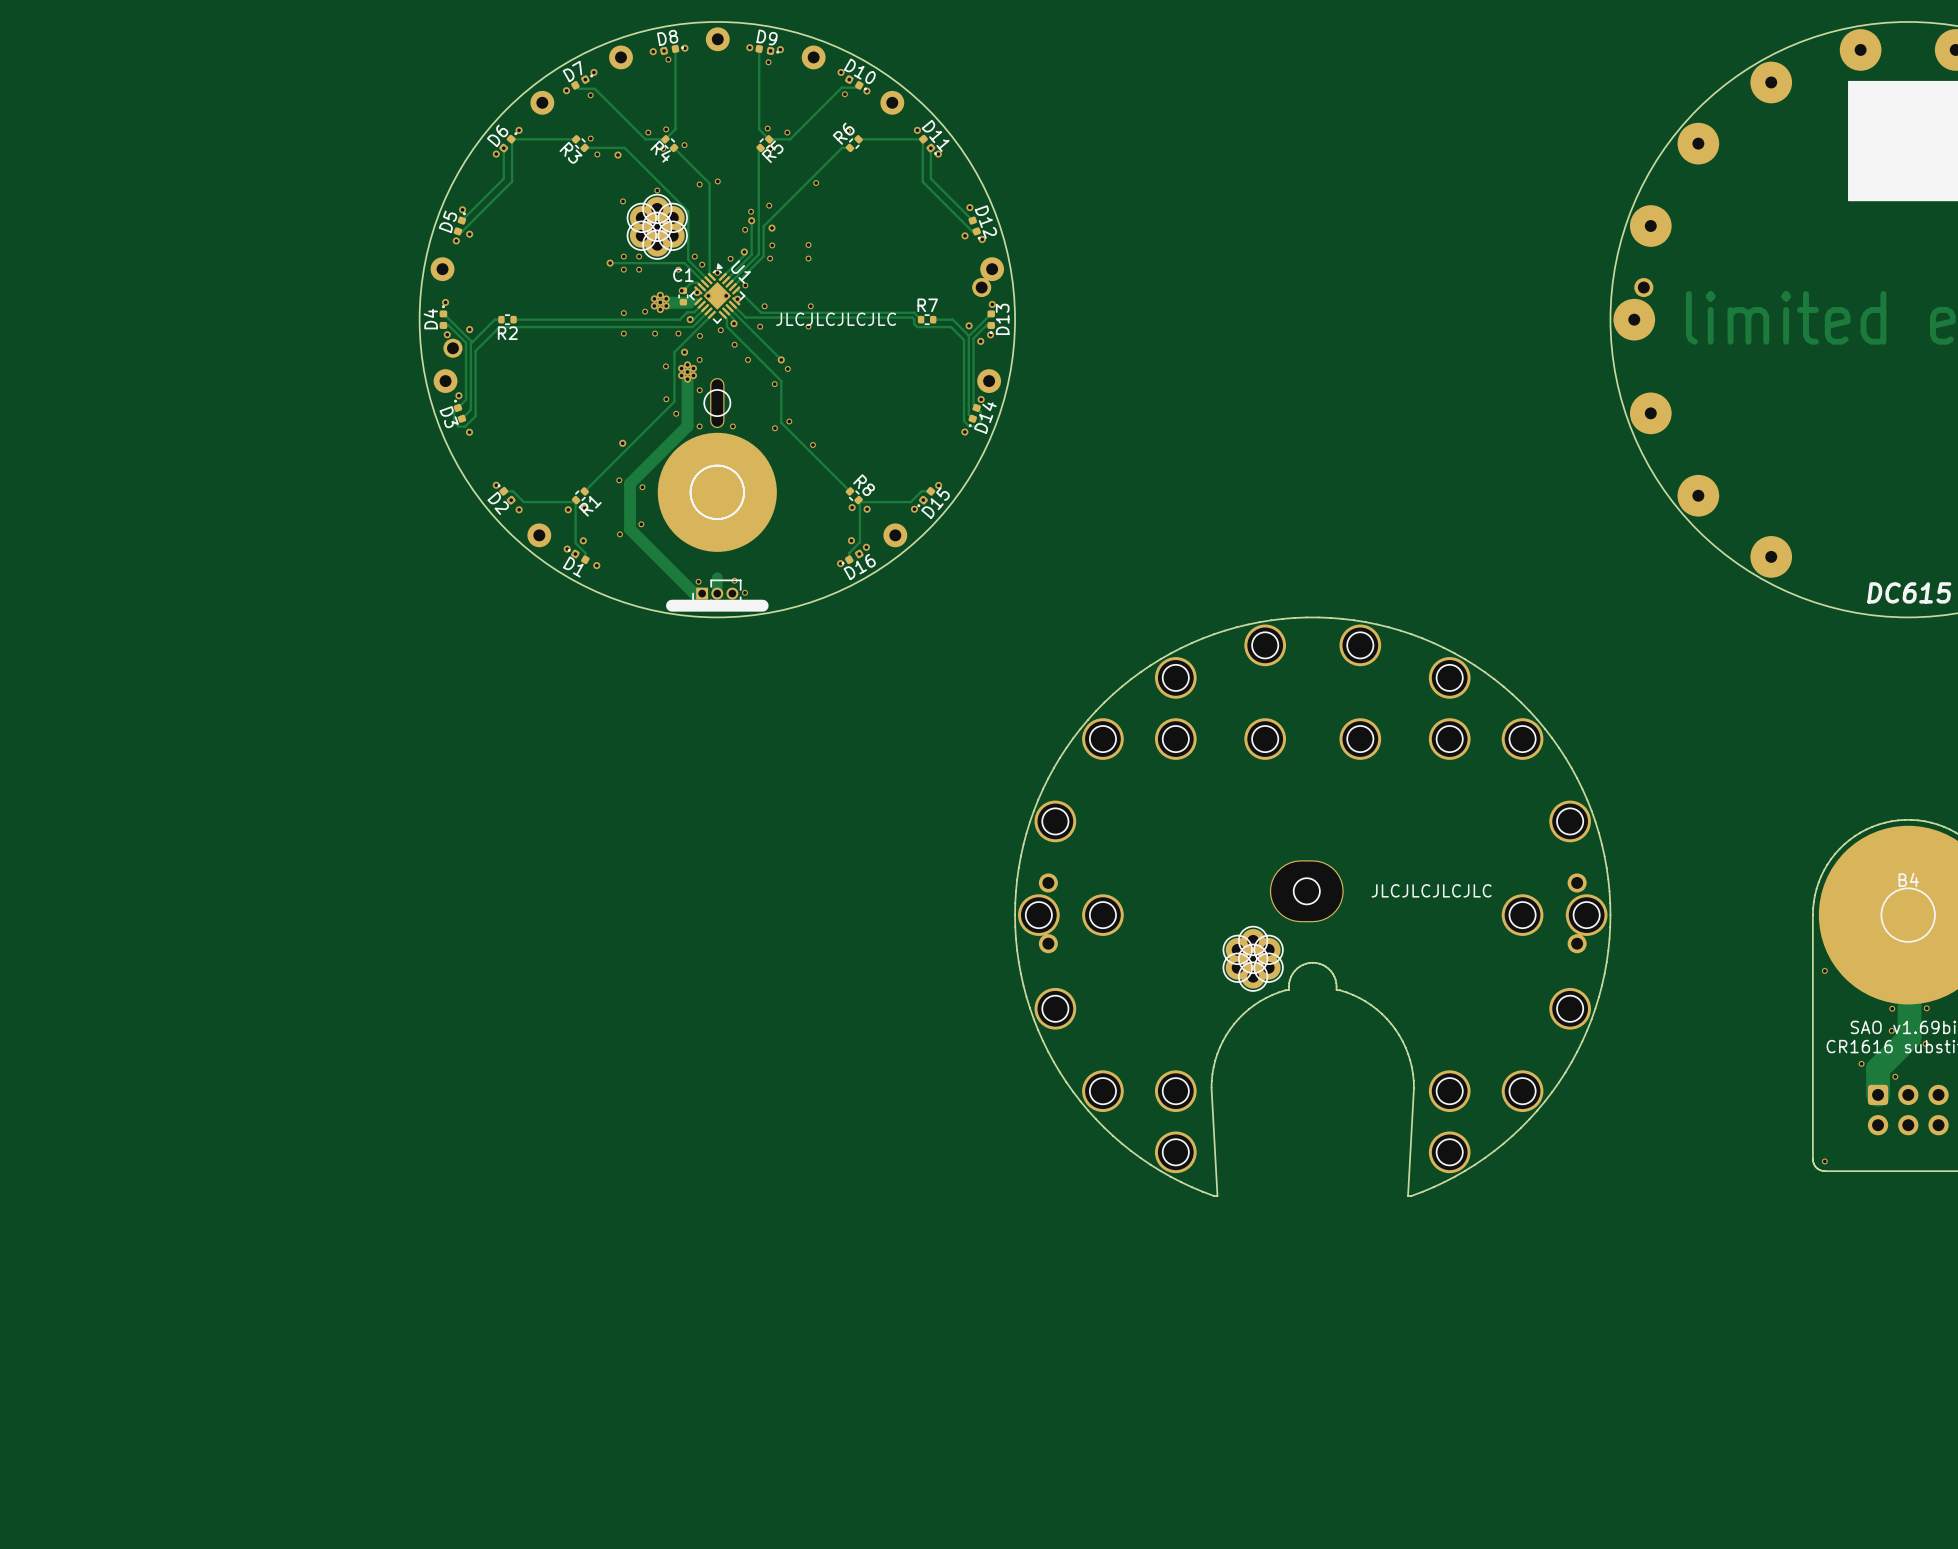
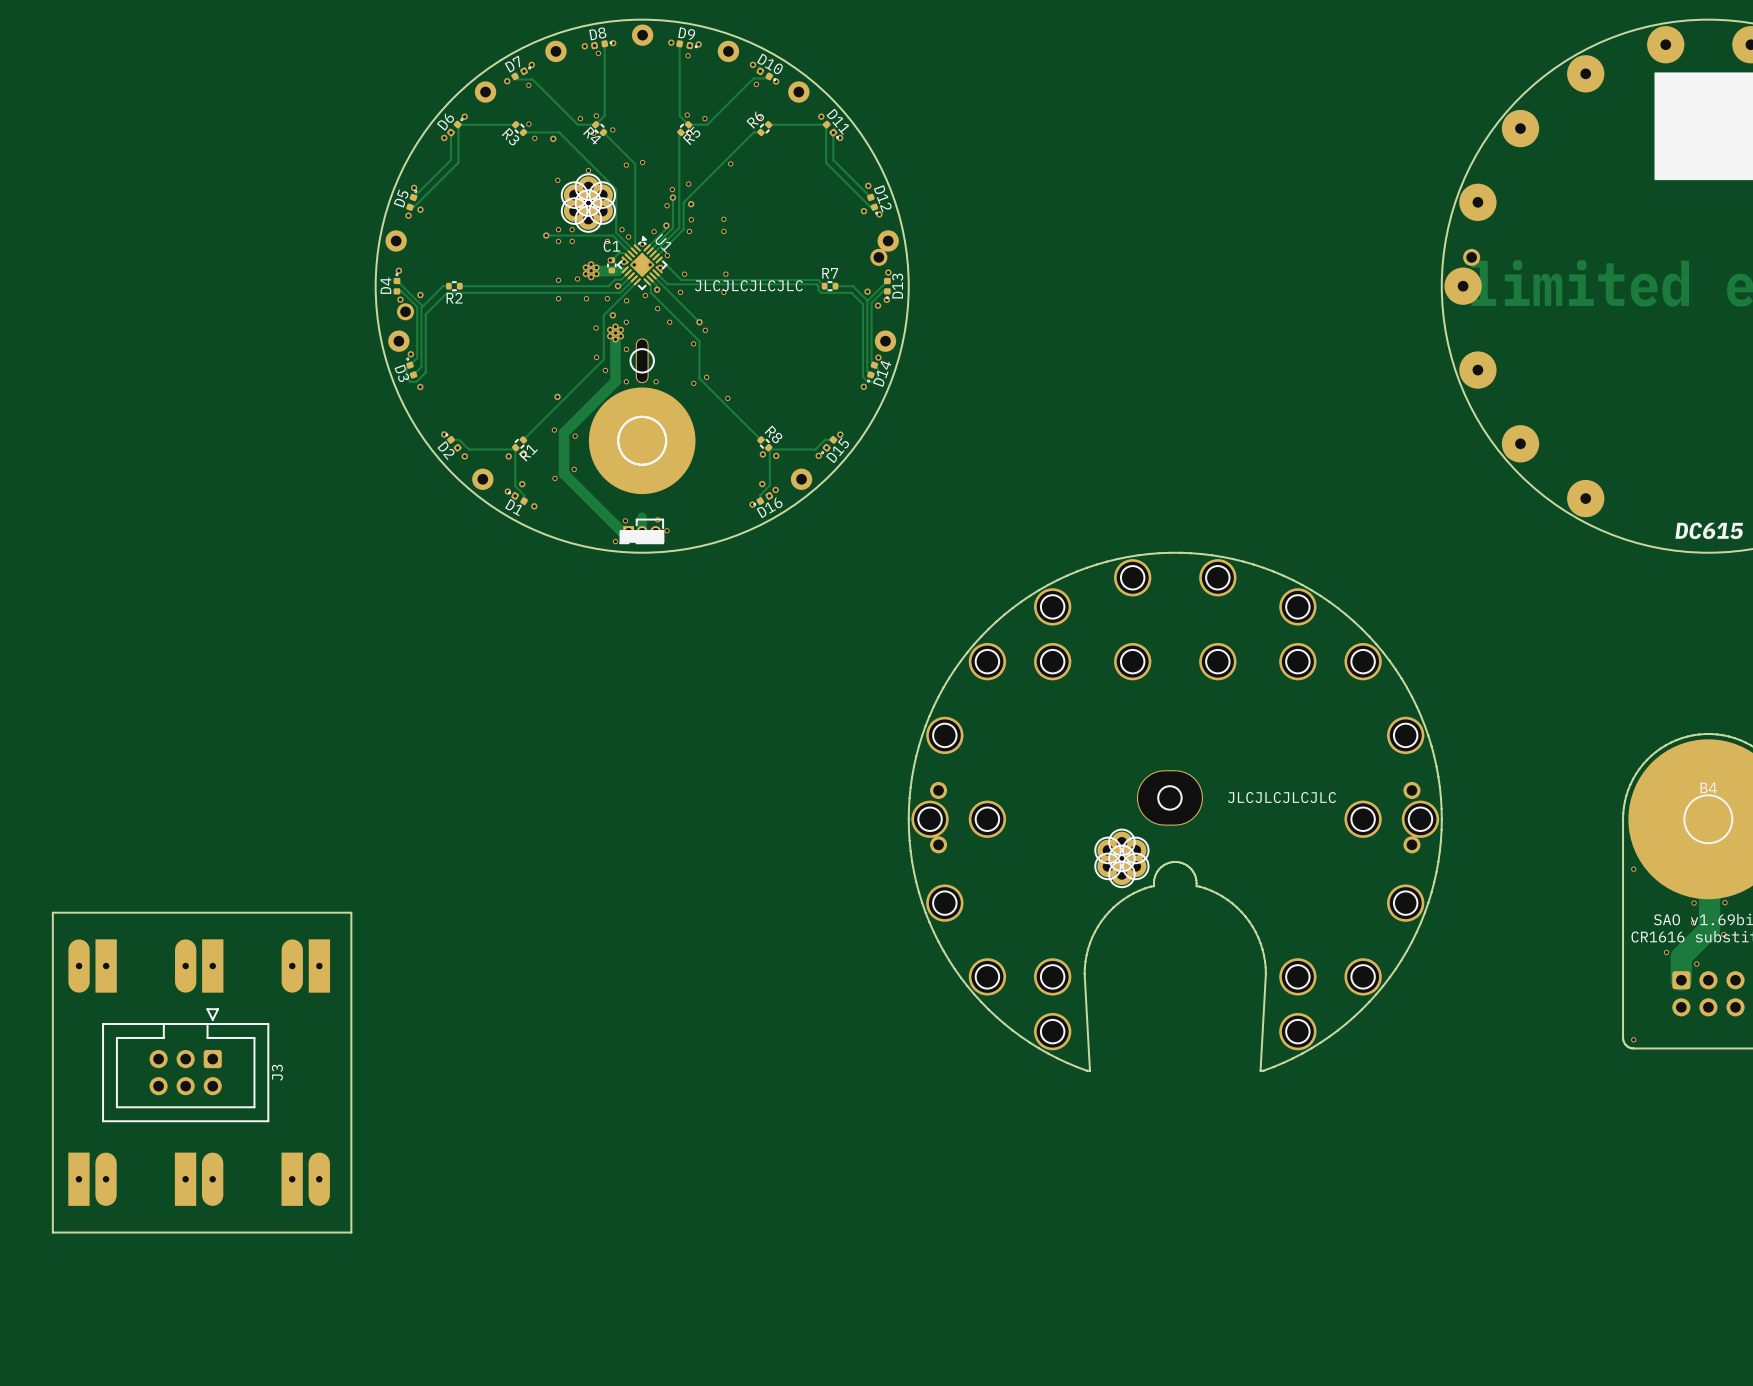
board edge: none -> (52, 912) (351, 912) (351, 1232) (52, 1232) (52, 912)
part: none -> (92, 966)
part: none -> (199, 966)
part: none -> (305, 966)
J3: none -> (185, 1065)
part: none -> (92, 1179)
part: none -> (199, 1179)
part: none -> (305, 1179)

